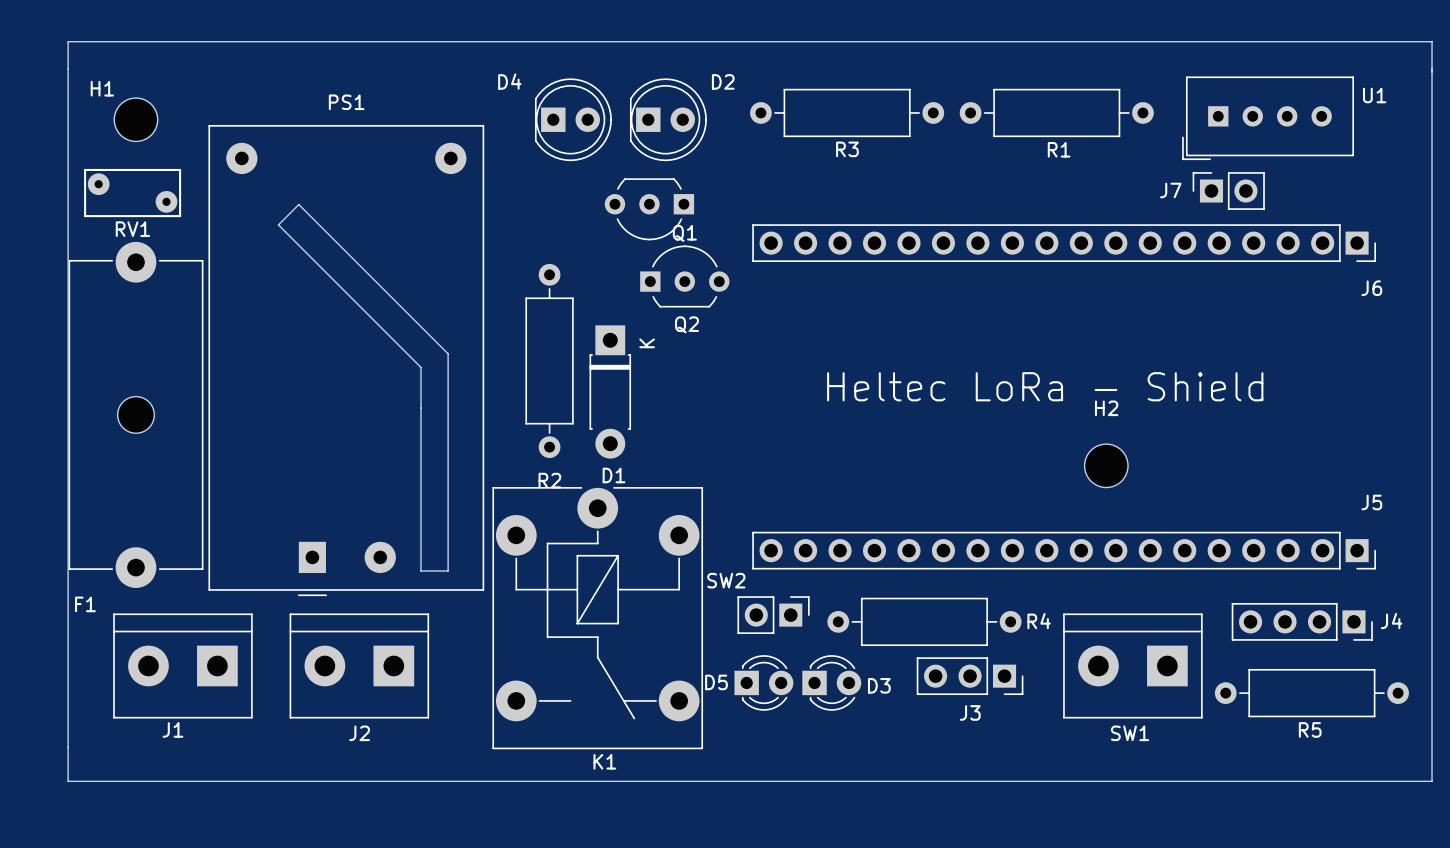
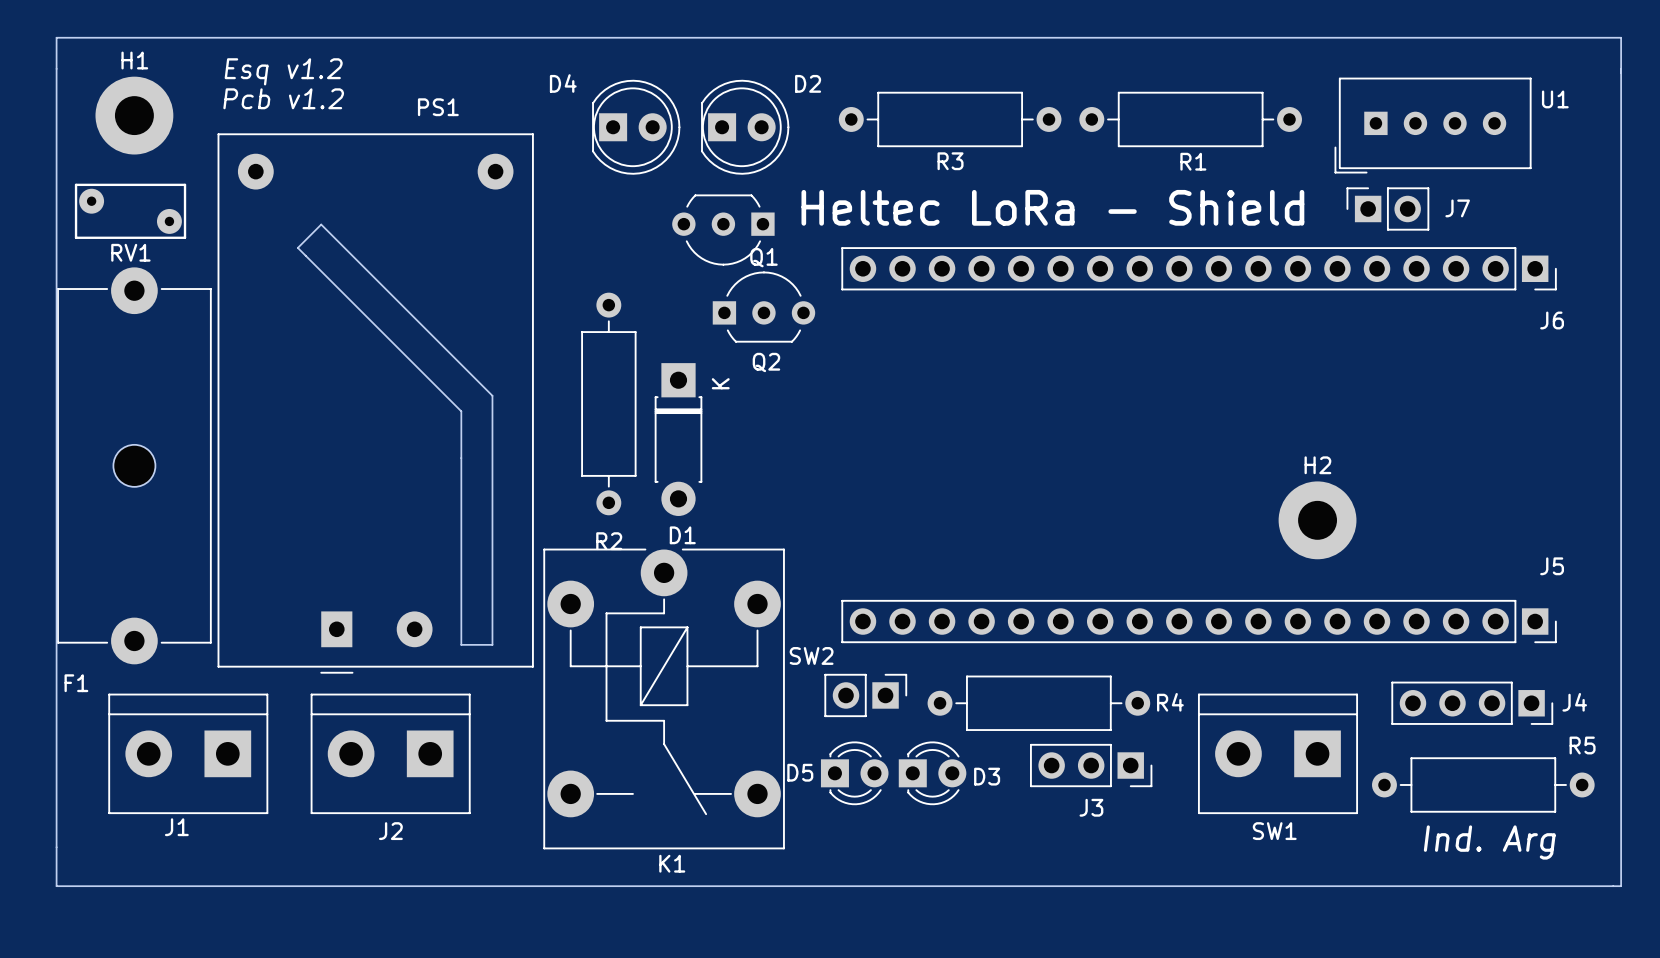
text: none -> Esq v1.2 (283, 71)
H1 name position: H1 (102, 88) -> H1 (134, 60)
text: none -> Pcb v1.2 (283, 98)
H1 footprint: [114, 98, 158, 142] -> [95, 76, 174, 155]
PS1 name position: PS1 (346, 102) -> PS1 (438, 107)
J7 name position: J7 (1170, 190) -> J7 (1457, 208)
text position: Heltec LoRa - Shield (1045, 386) -> Heltec LoRa - Shield (1052, 207)
H2 footprint: [1084, 444, 1129, 488] -> [1278, 481, 1357, 560]
R5 name position: R5 (1310, 729) -> R5 (1582, 745)
text: none -> Ind. Arg (1489, 842)

